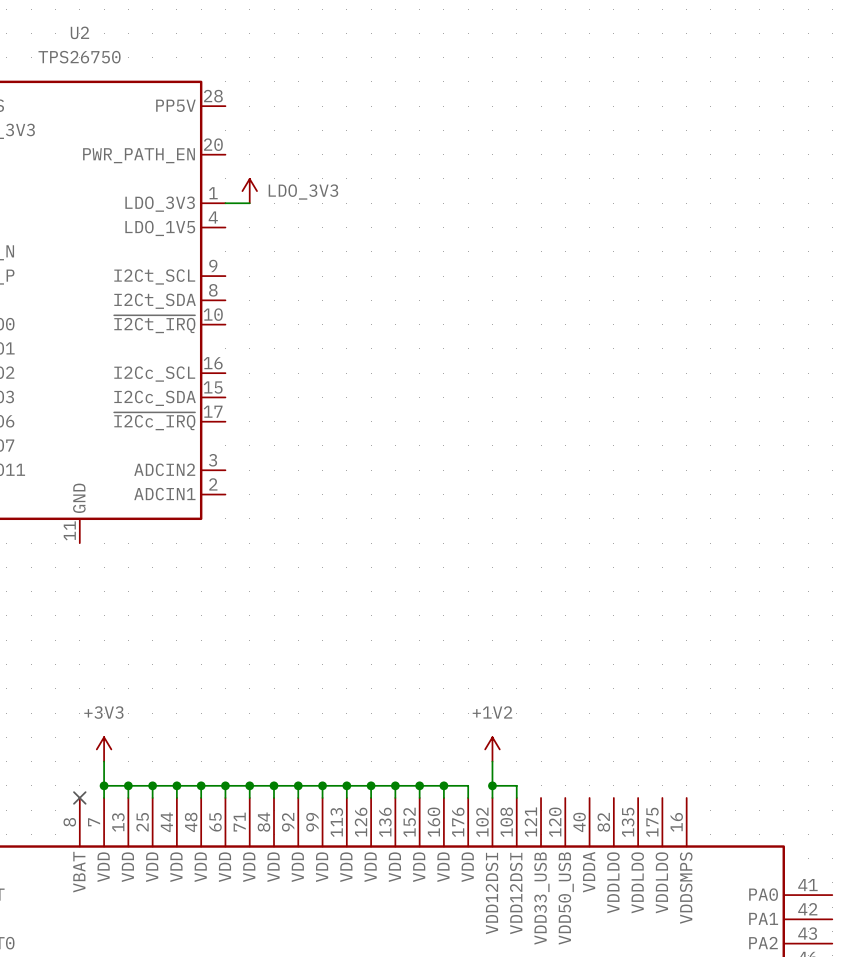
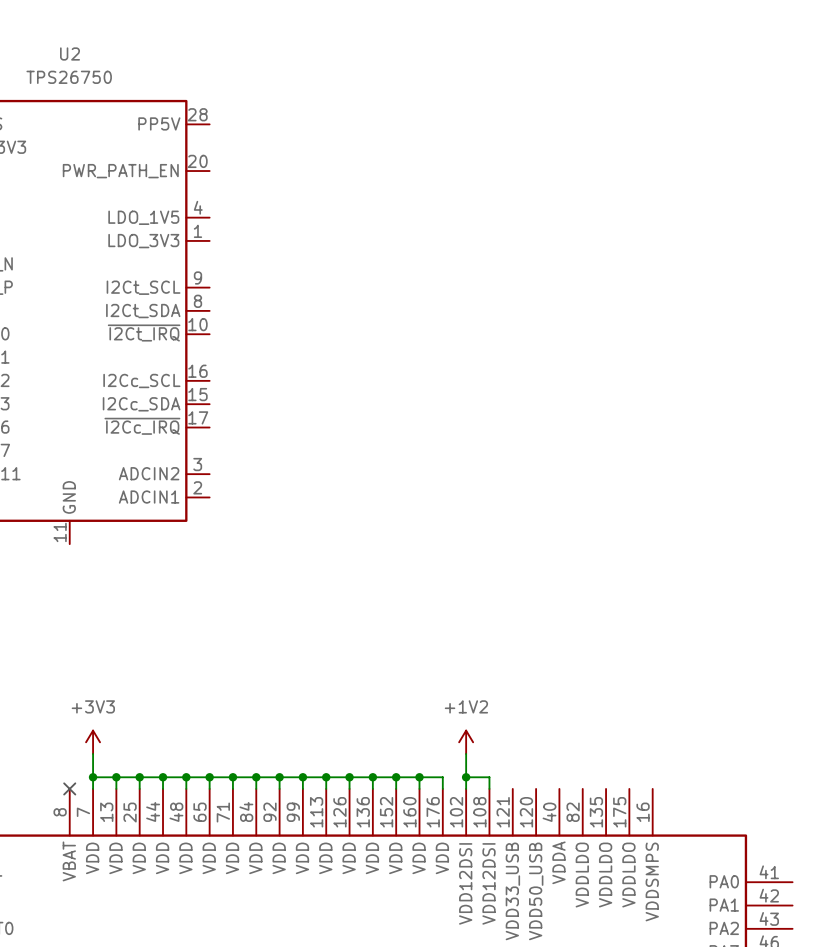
power symbol: LDO_3V3 (249, 191) -> none
U2 pin number: 1 (213, 193) -> 4 (198, 207)
wire: (225, 203) (249, 203) -> none
U2 pin name: LDO_3V3 (160, 204) -> LDO_1V5 (143, 217)
U2 pin number: 4 (213, 217) -> 1 (197, 231)
U2 pin name: LDO_1V5 (160, 228) -> LDO_3V3 (143, 241)

